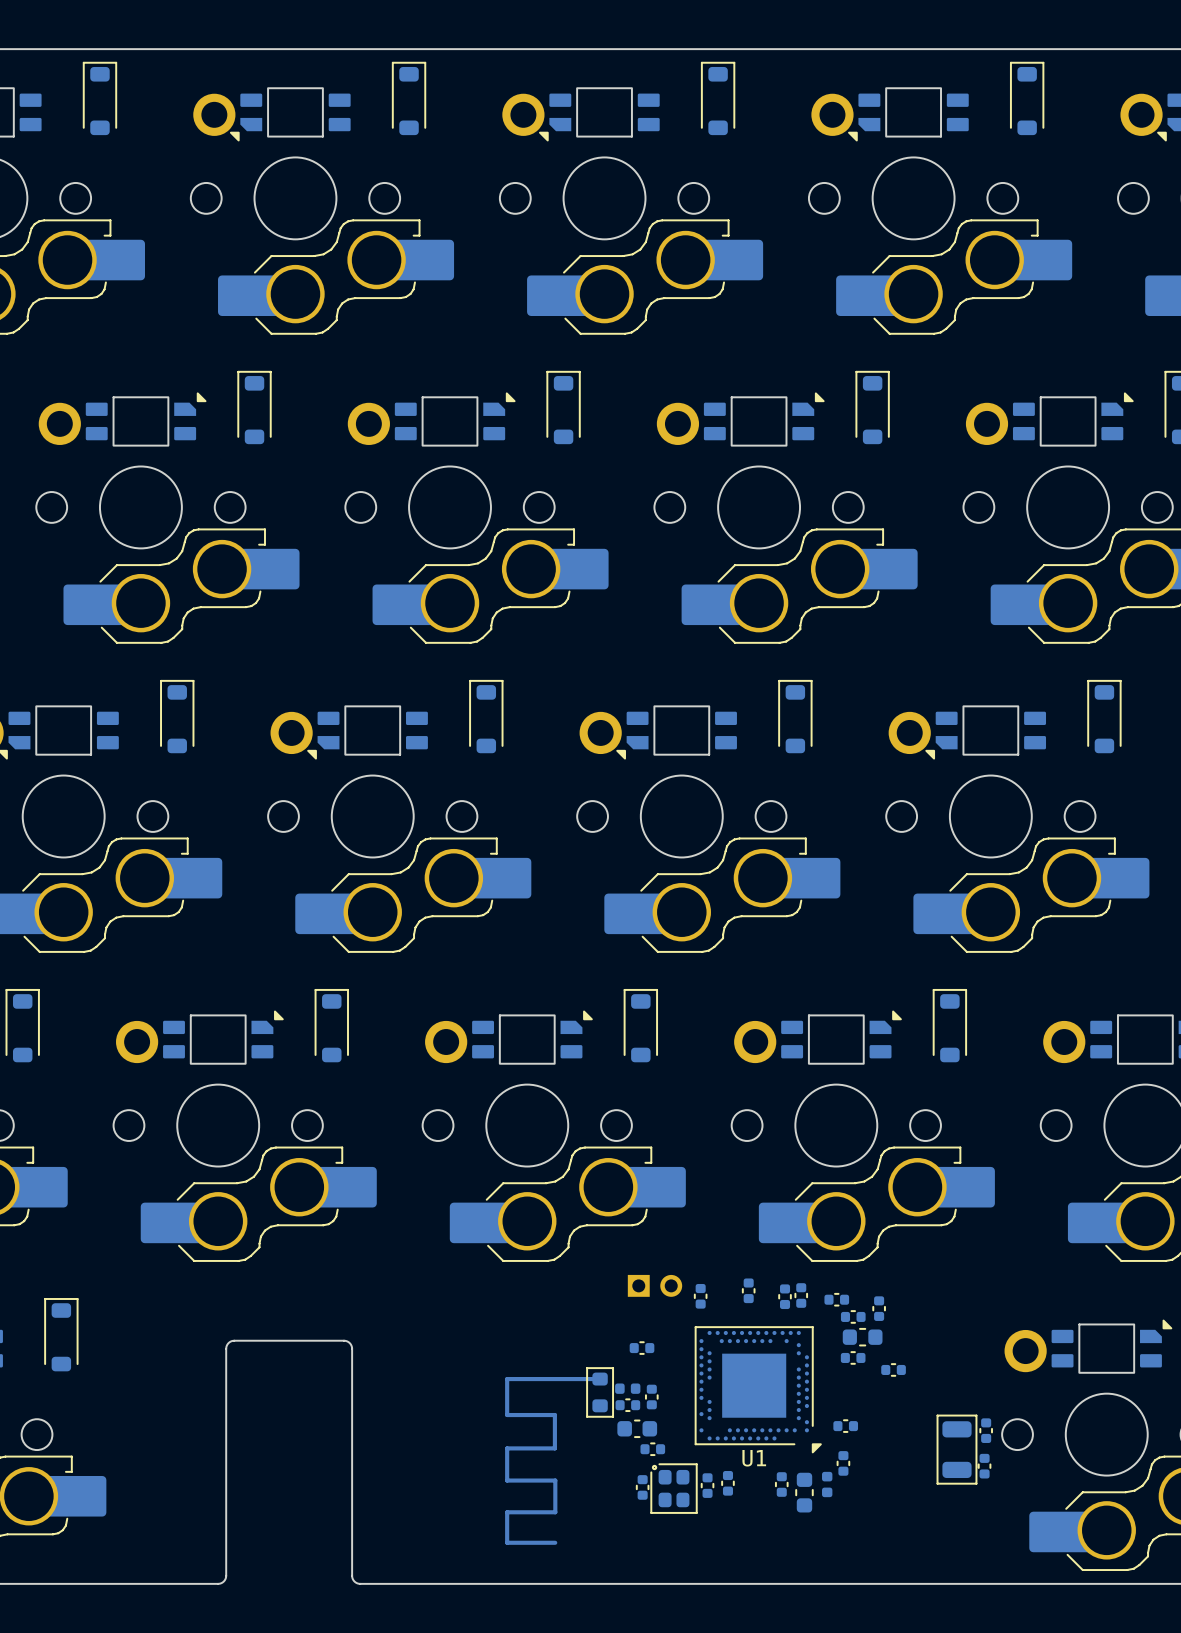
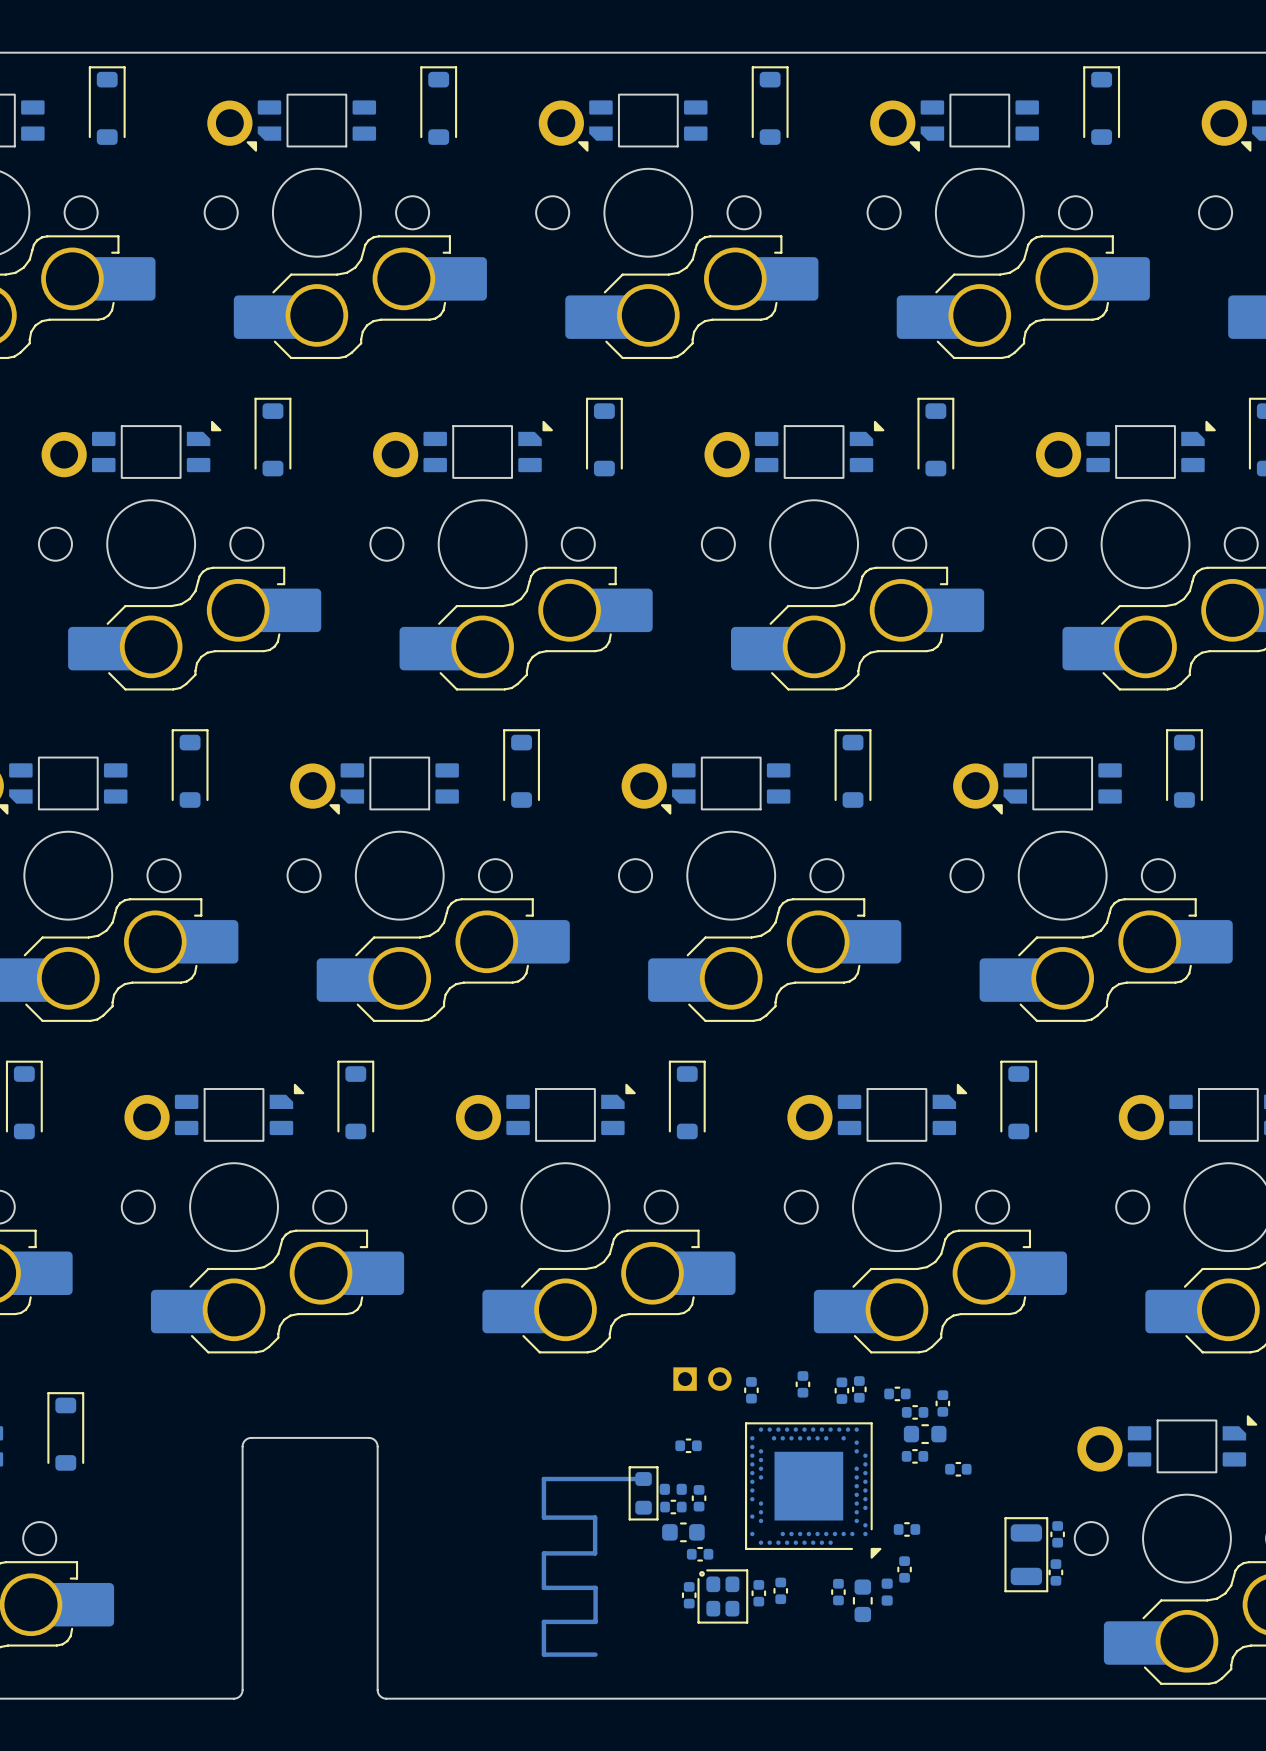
U1 name: U1 (754, 1458) -> none

